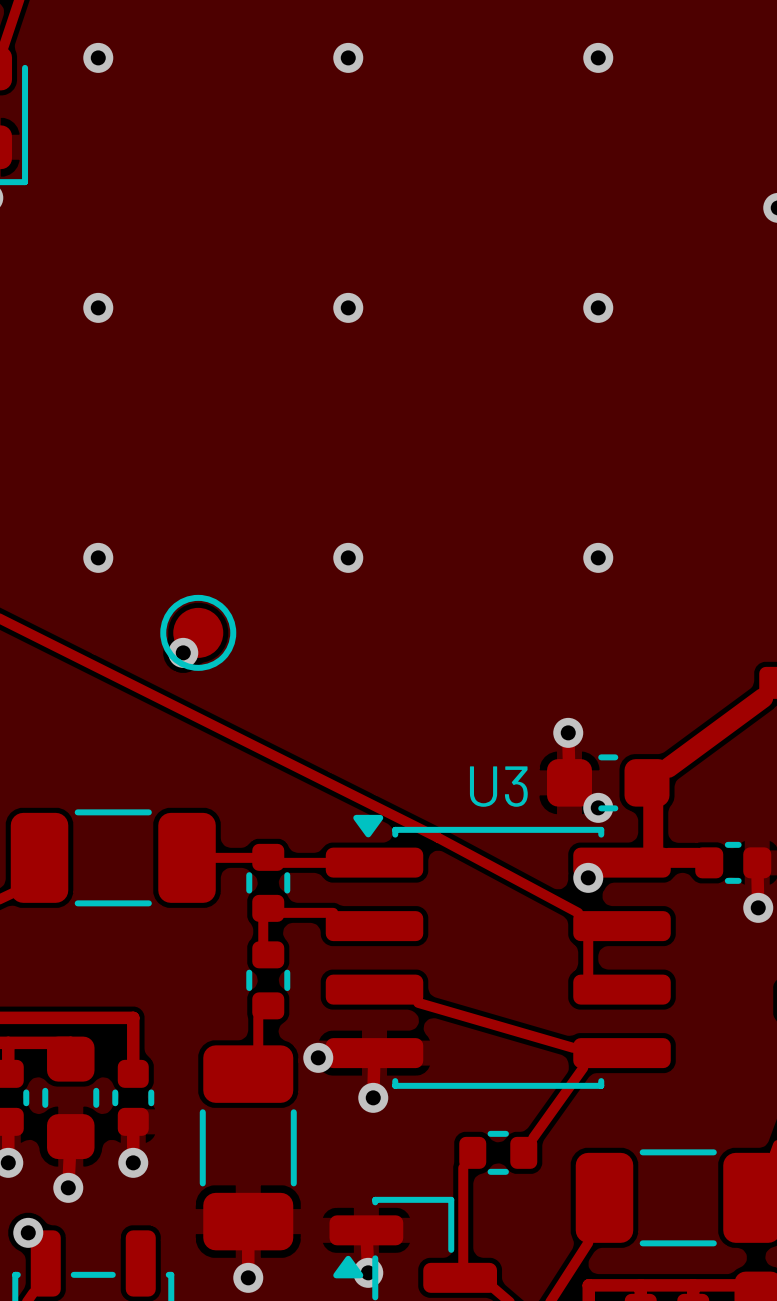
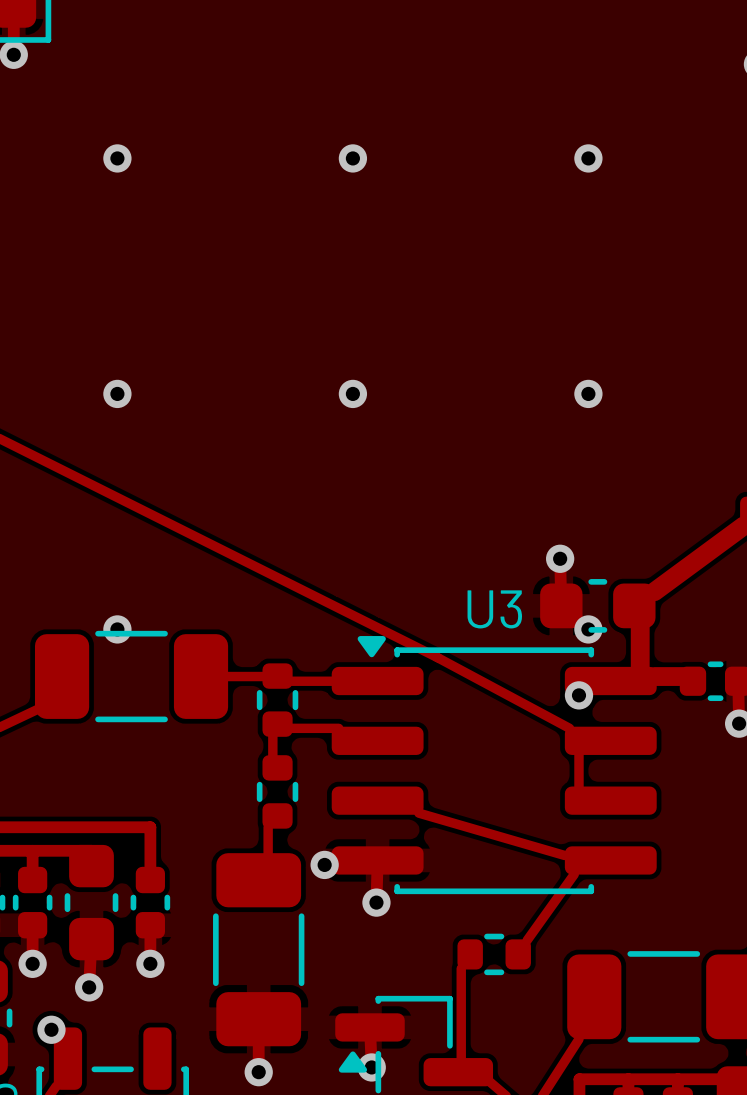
part: (198, 632) -> none
via position: (183, 652) -> (117, 629)

